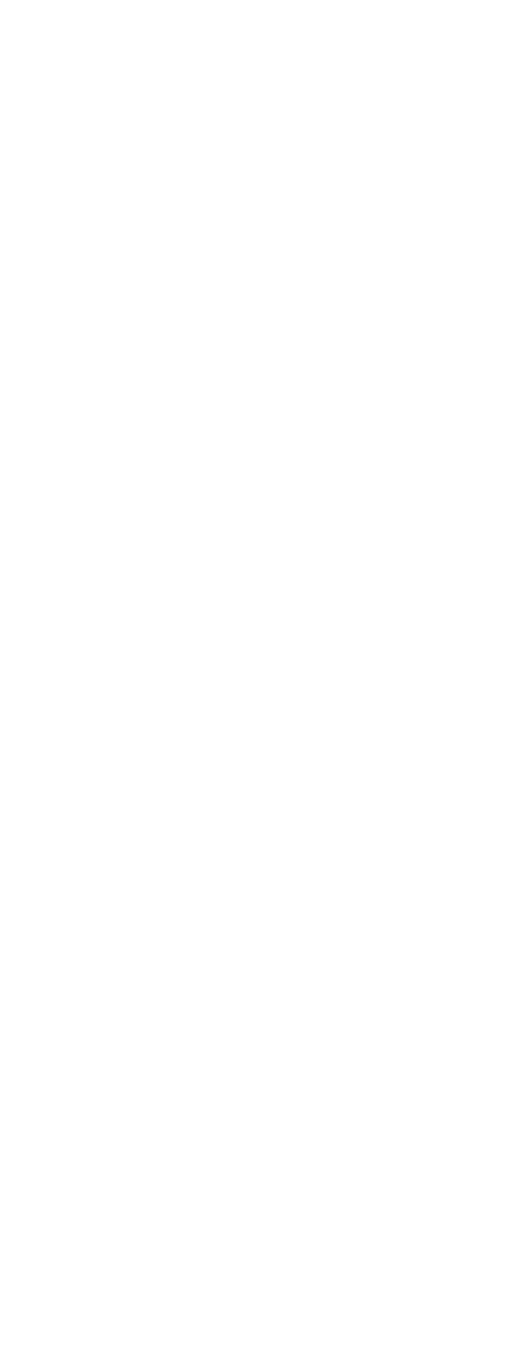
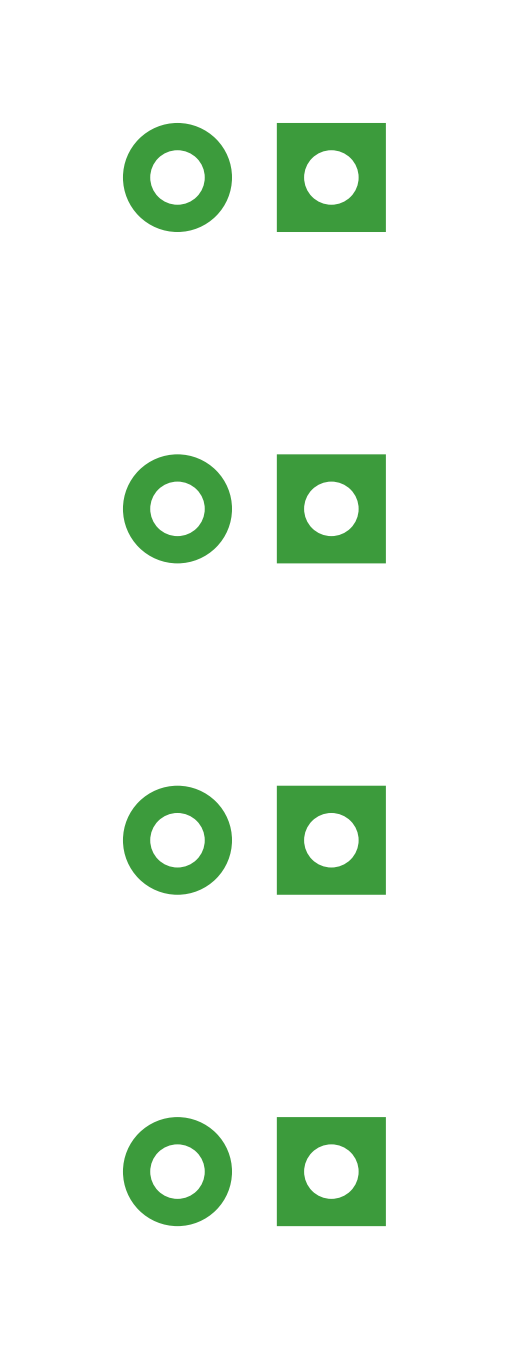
part: none -> (254, 177)
part: none -> (254, 508)
part: none -> (254, 840)
part: none -> (254, 1171)

